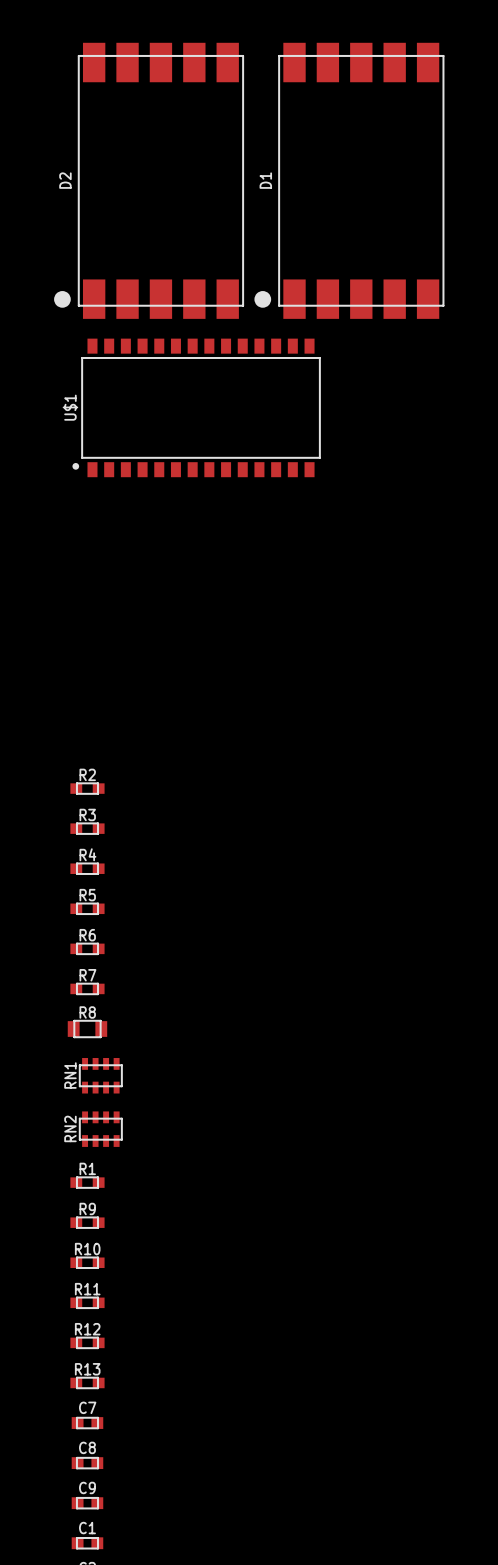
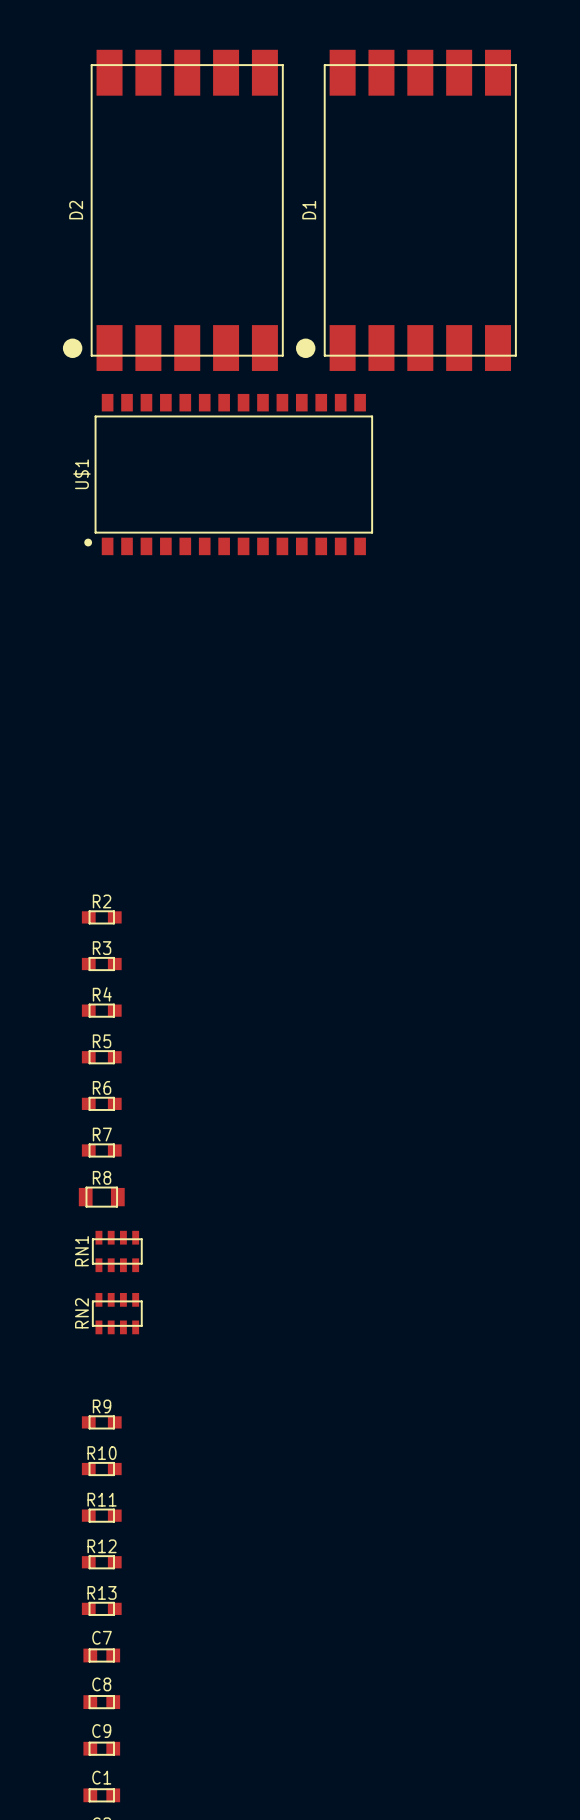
R1: (87, 1182) -> none

